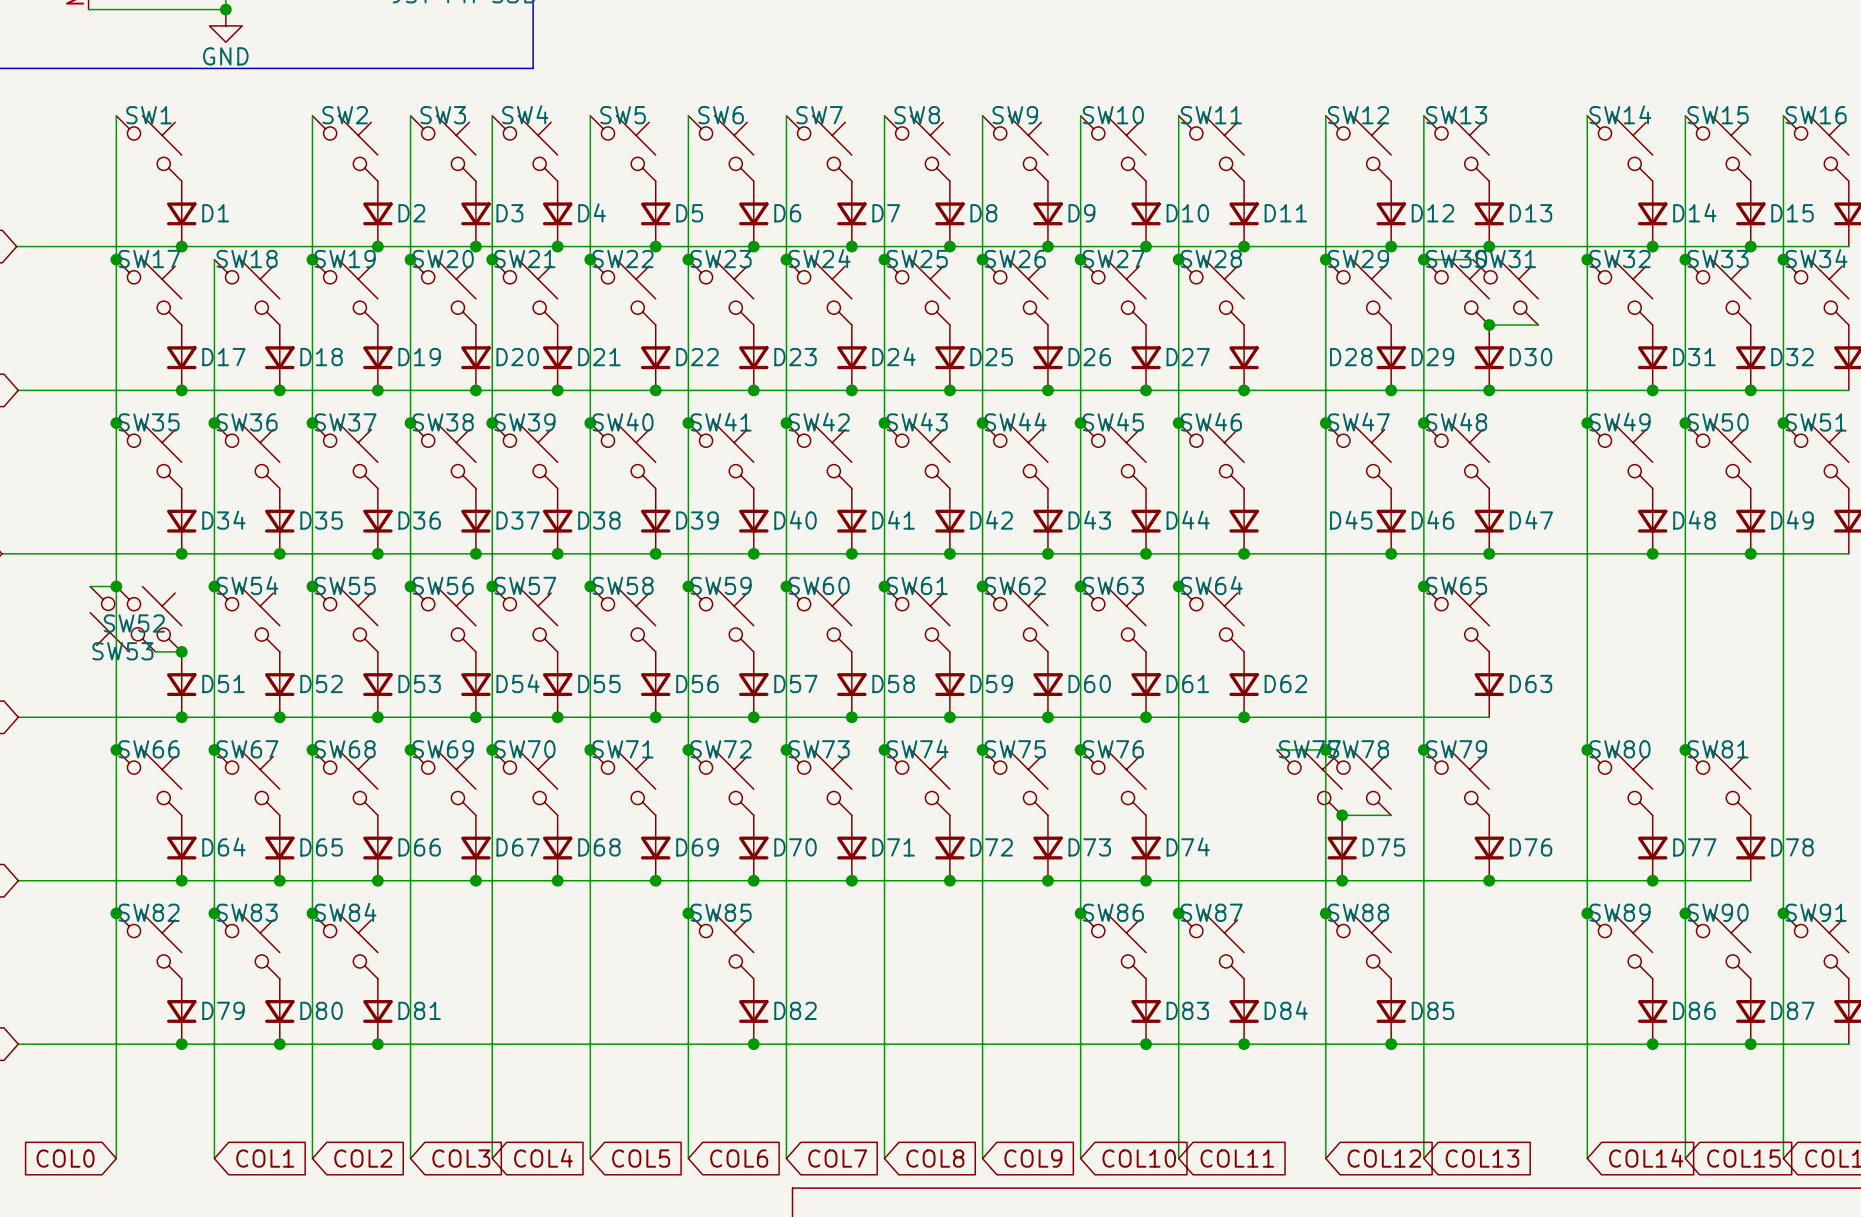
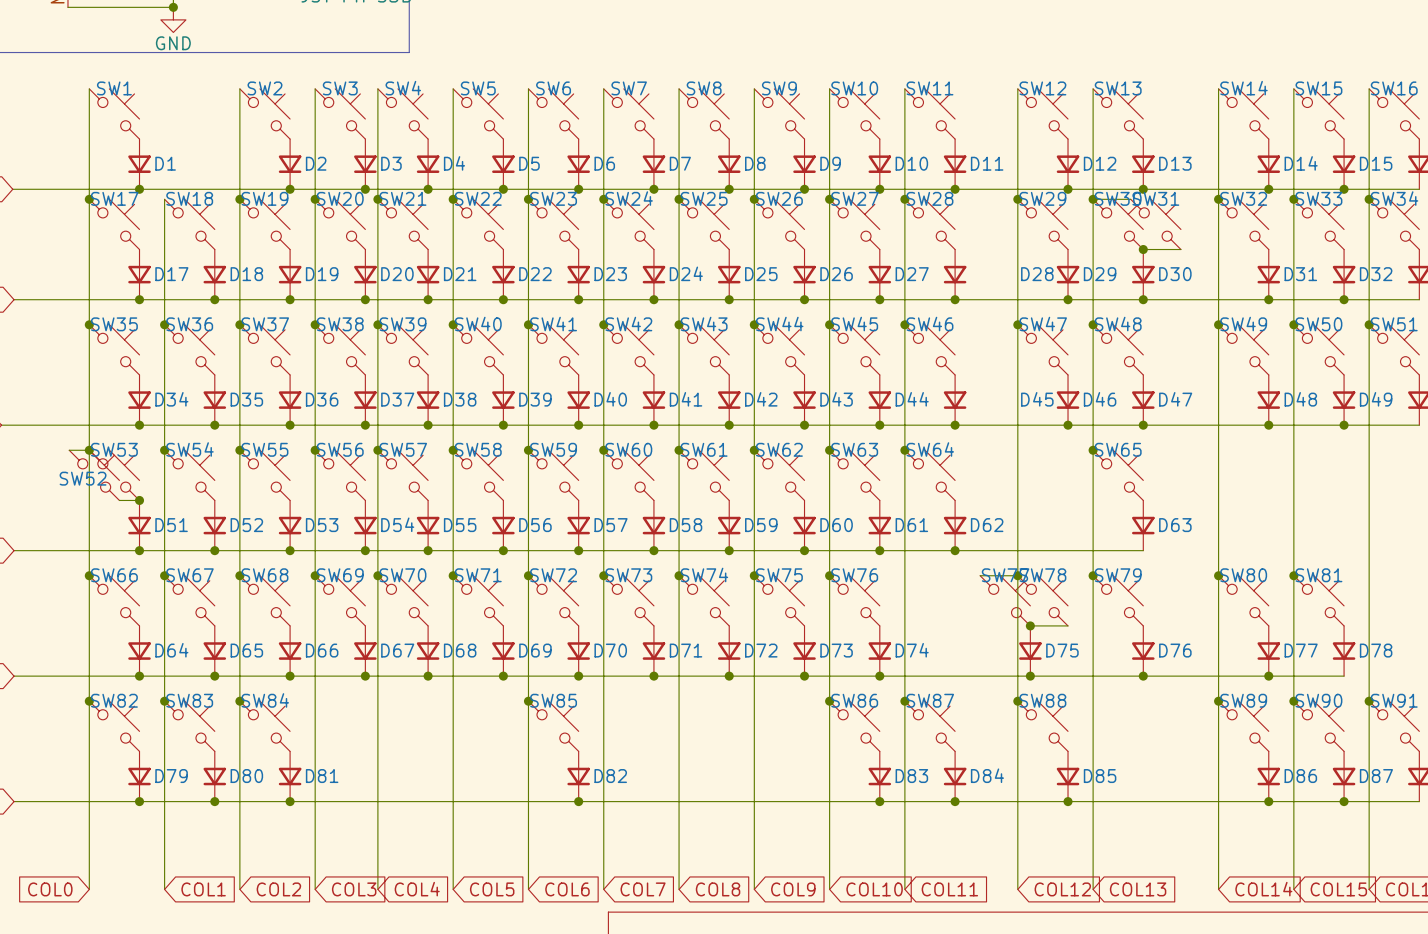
SW53: (122, 619) -> none
SW52: none -> (94, 475)
SW52 name: SW52 (134, 623) -> SW53 (114, 449)

